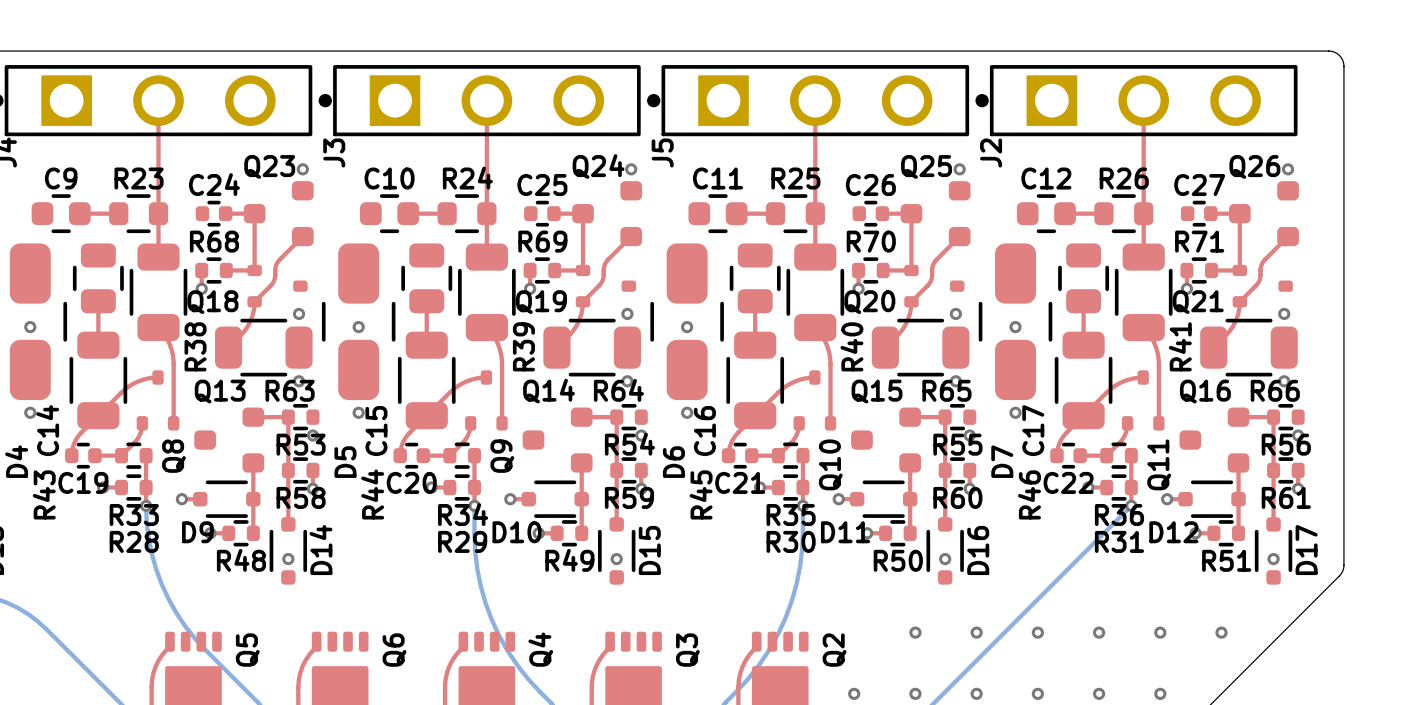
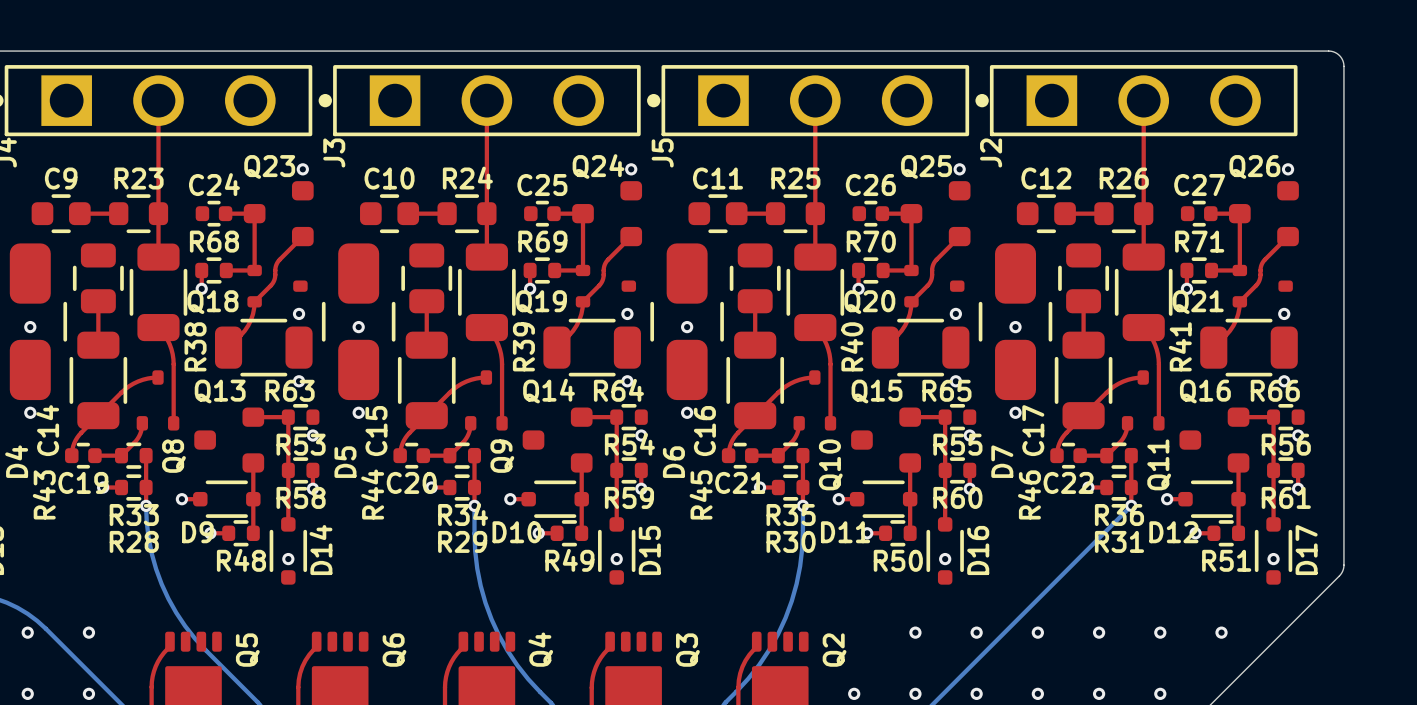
via: none -> (27, 632)
via: none -> (88, 632)
via: none -> (27, 693)
via: none -> (88, 693)

